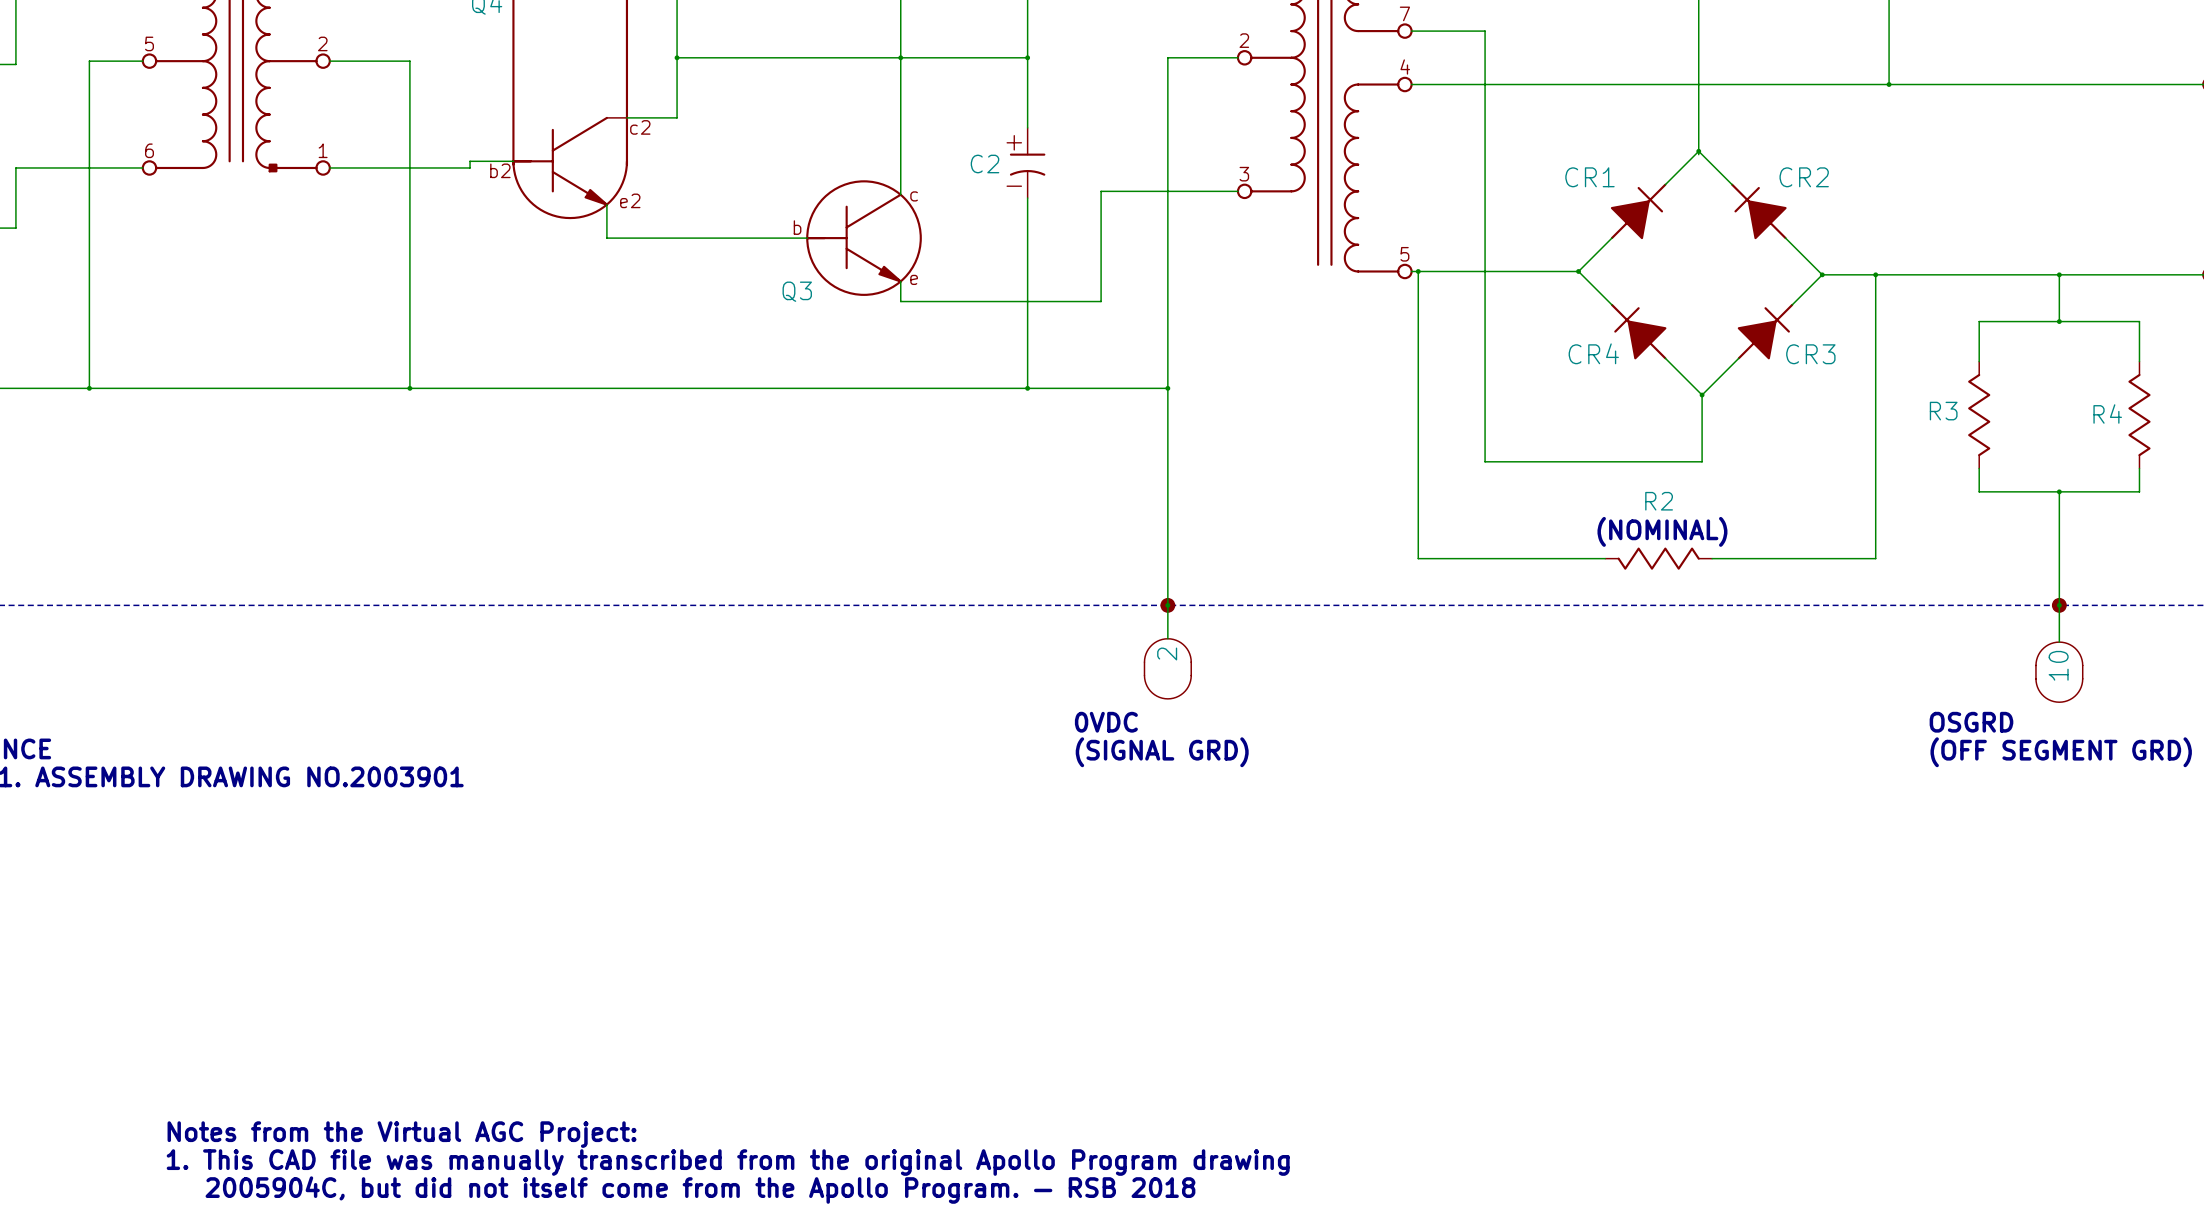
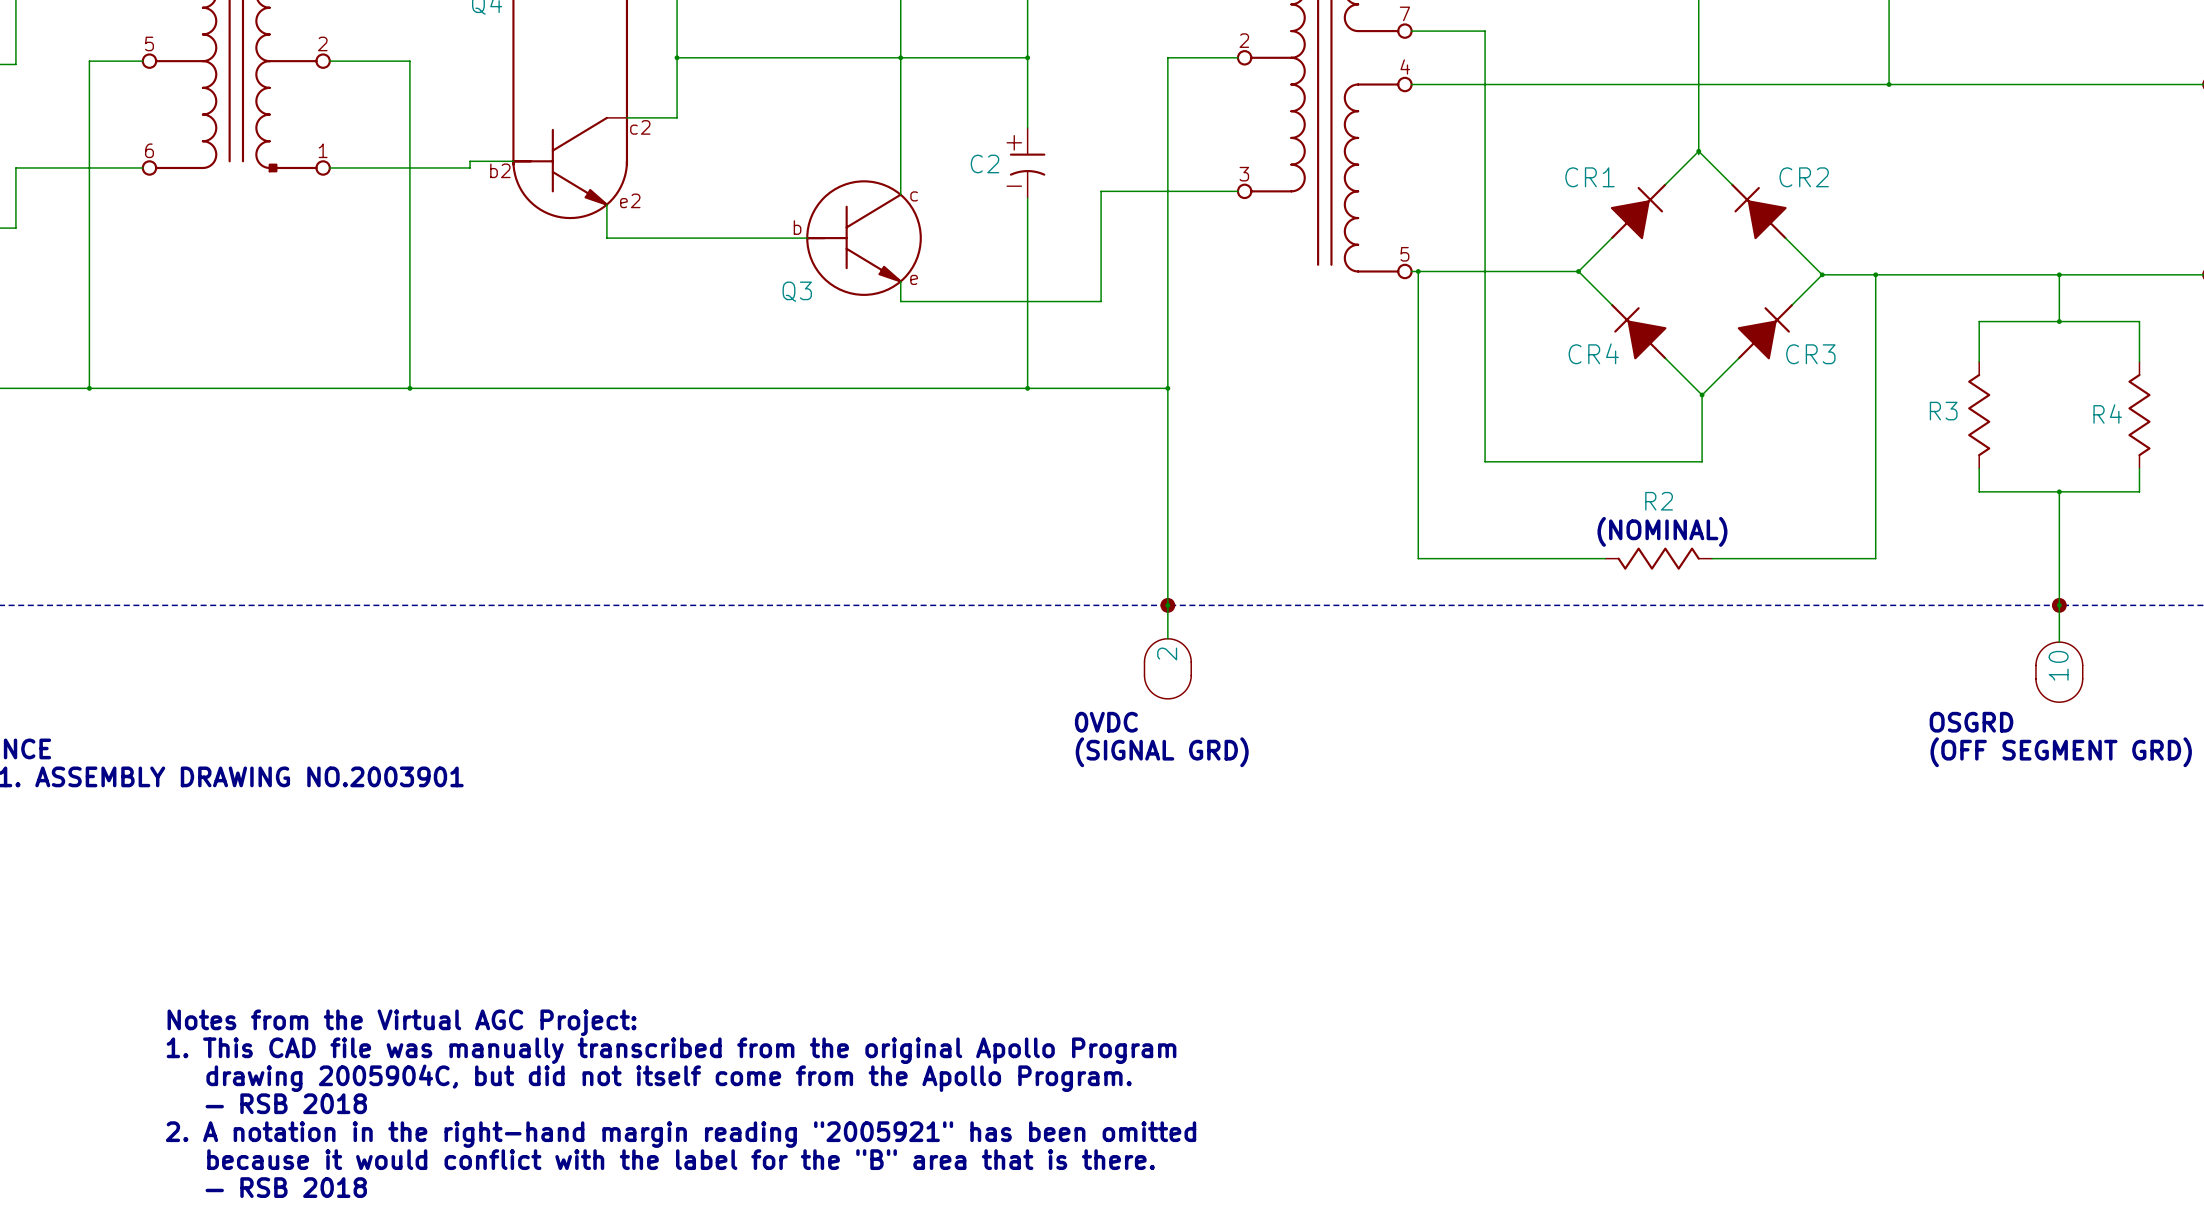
text: none -> Notes from the Virtual AGC Project: (402, 1022)
text: none -> 1. This CAD file was manually transcribed from the original Apollo Program (671, 1050)
text: none -> drawing 2005904C, but did not itself come from the Apollo Program. (669, 1078)
text: none -> — RSB 2018 (286, 1103)
text: Notes from the Virtual AGC Project: (402, 1134) -> 2. A notation in the right-hand margin reading "2005921" has been omitted (681, 1134)
text: 1. This CAD file was manually transcribed from the original Apollo Program drawing (728, 1162) -> because it would conflict with the label for the "B" area that is there. (681, 1159)
text: 2005904C, but did not itself come from the Apollo Program. — RSB 2018 (700, 1190) -> — RSB 2018 (286, 1187)

